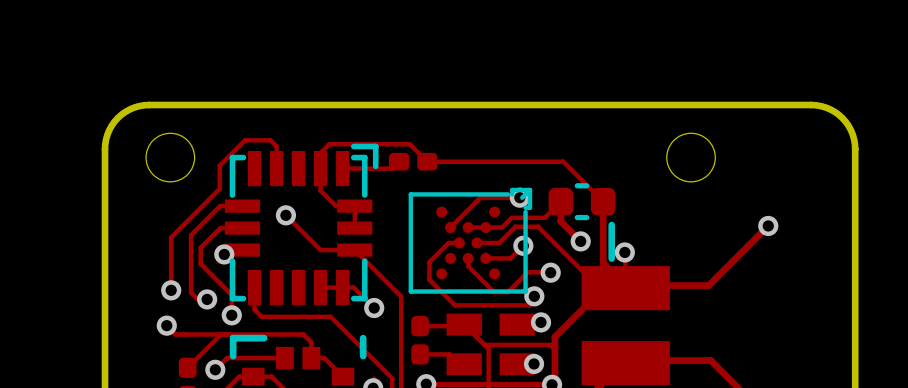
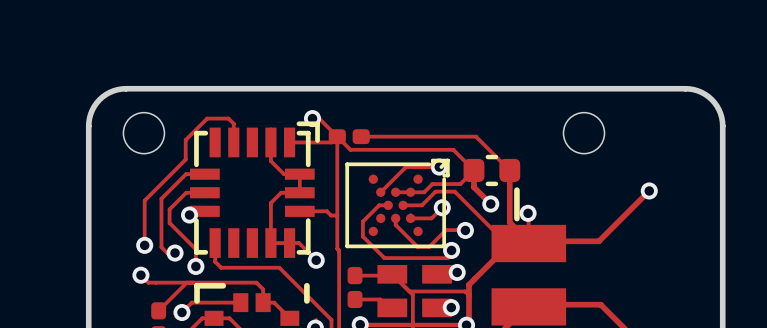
track: none -> (312, 118) (319, 118) (350, 149) (453, 149) (473, 170)
track: (320, 152) (329, 144) (409, 144) (427, 161) -> none
track: (285, 215) (320, 250) (354, 250) (399, 294) -> (337, 136) (337, 248)
via position: (285, 215) -> (312, 118)
track: none -> (299, 192) (281, 192) (270, 202) (270, 243)
track: none -> (299, 211) (326, 211) (331, 215) (337, 215)

